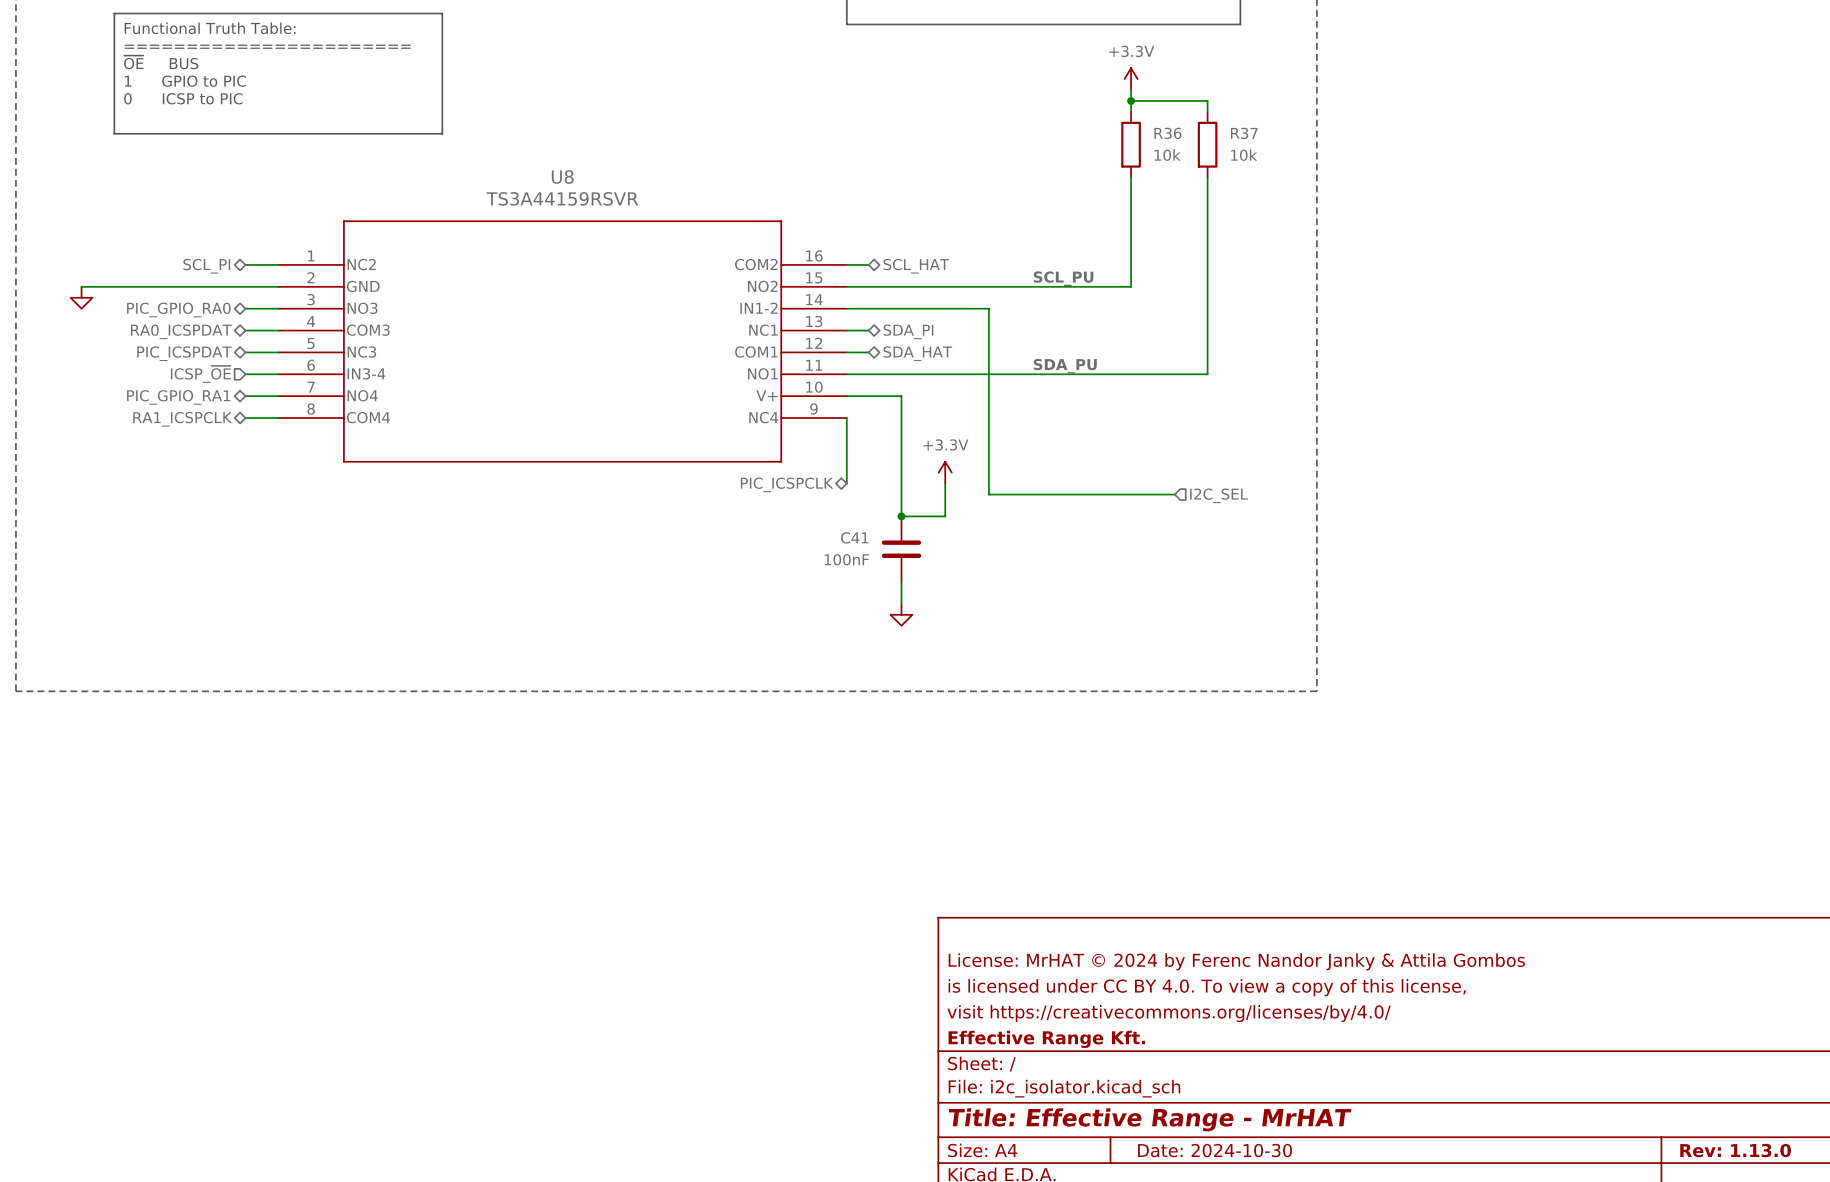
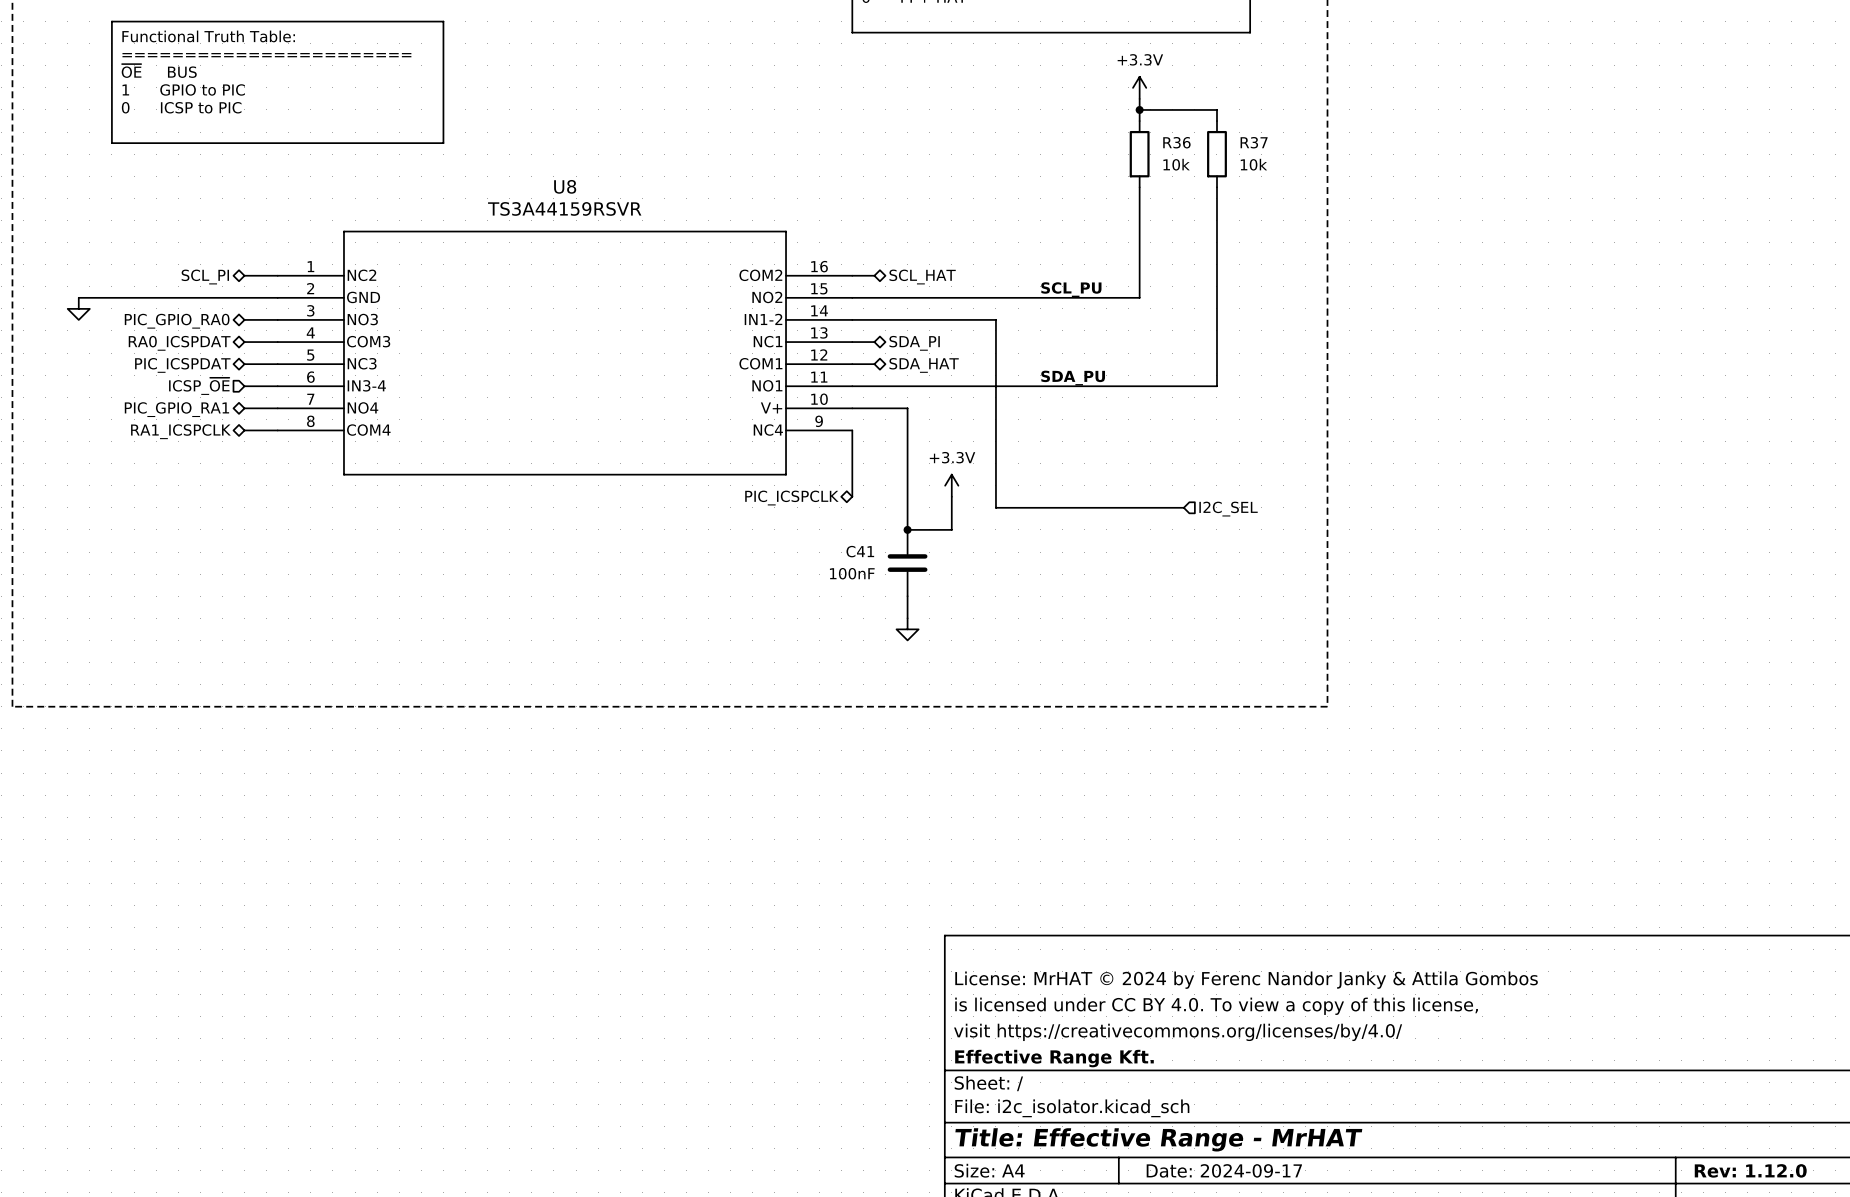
title block: Date: 2024-10-30 (1215, 1150) -> Date: 2024-09-17 (1224, 1170)
title block: Rev: 1.13.0 (1735, 1150) -> Rev: 1.12.0 (1750, 1170)

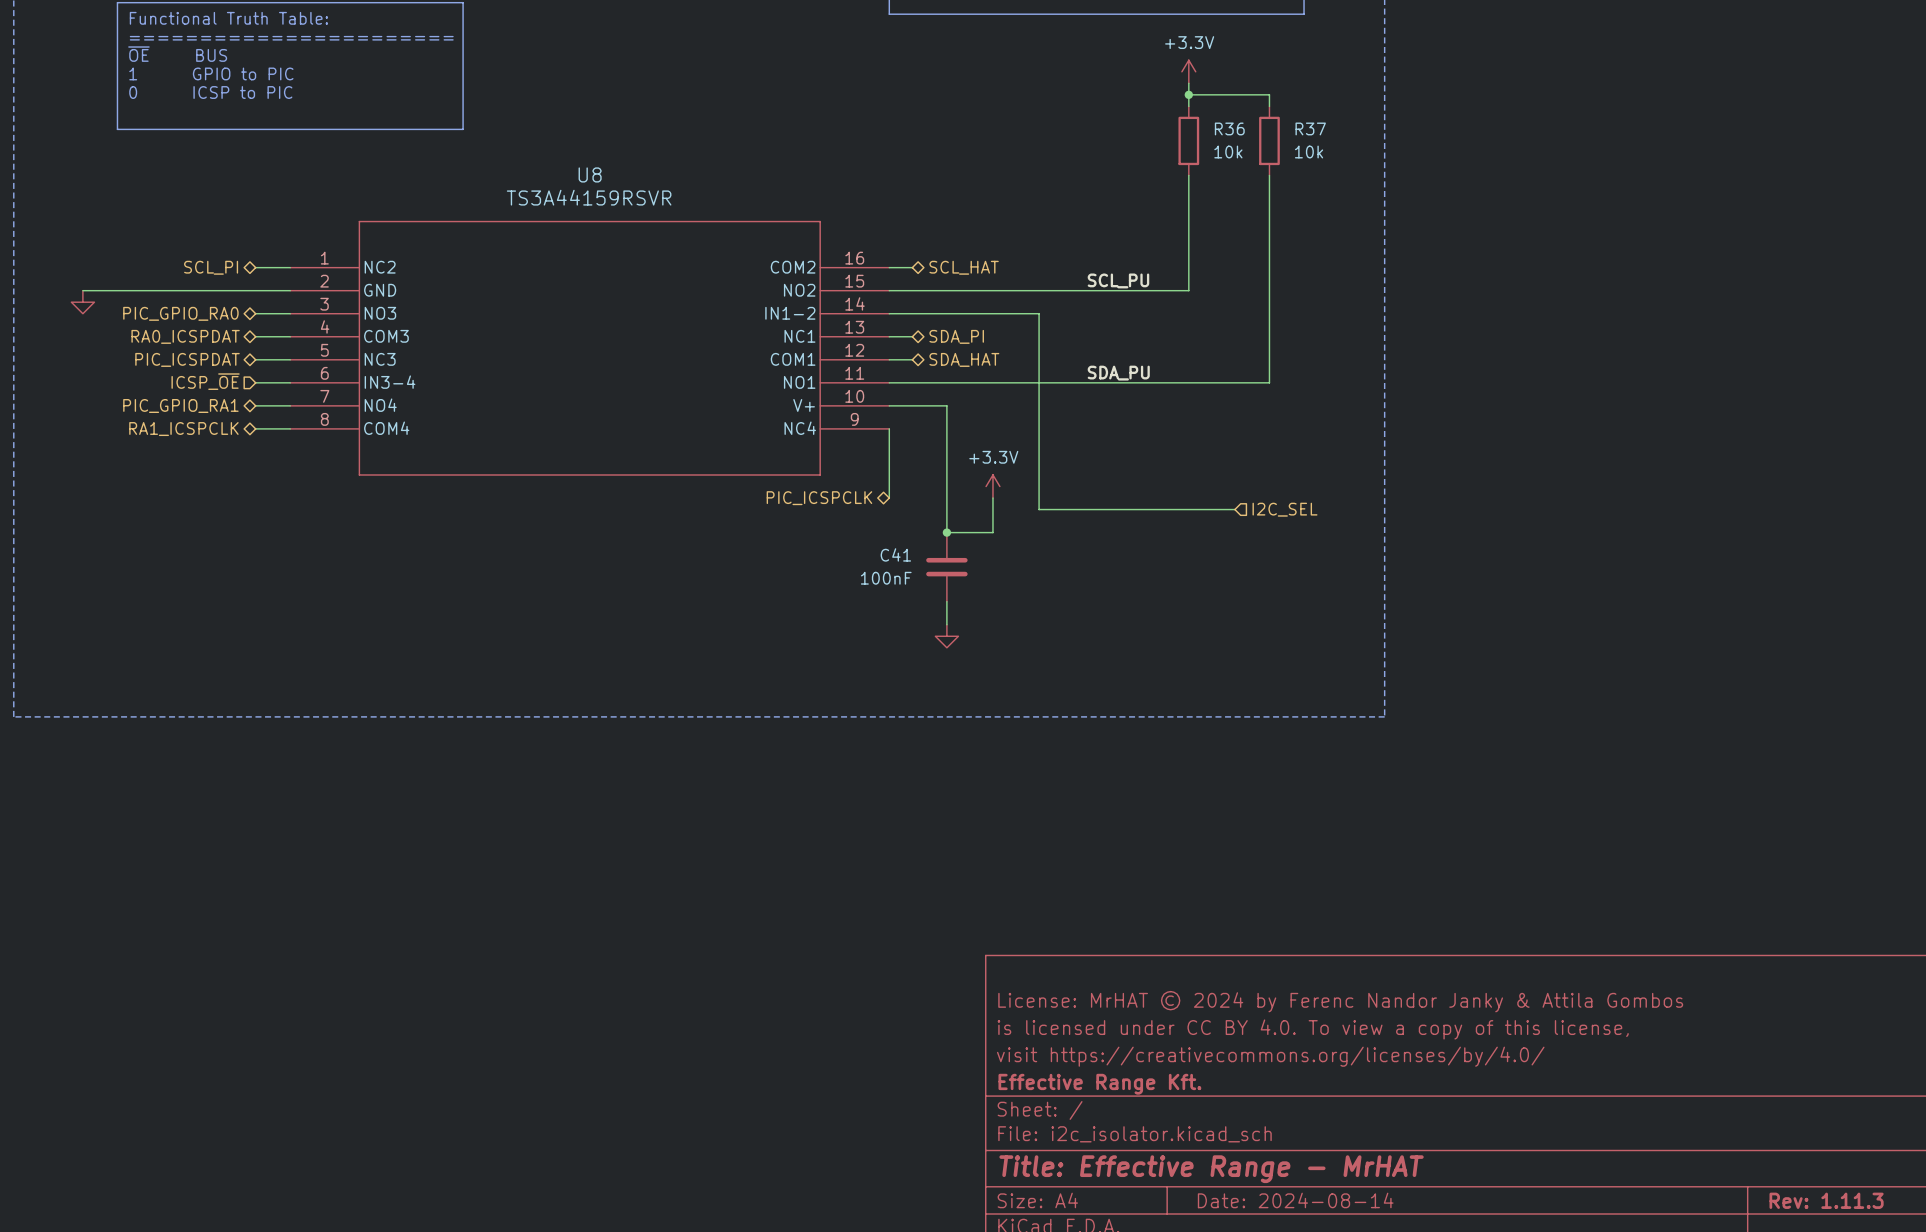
title block: Date: 2024-09-17 (1224, 1170) -> Date: 2024-08-14 (1295, 1200)
title block: Rev: 1.12.0 (1750, 1170) -> Rev: 1.11.3 (1826, 1200)

